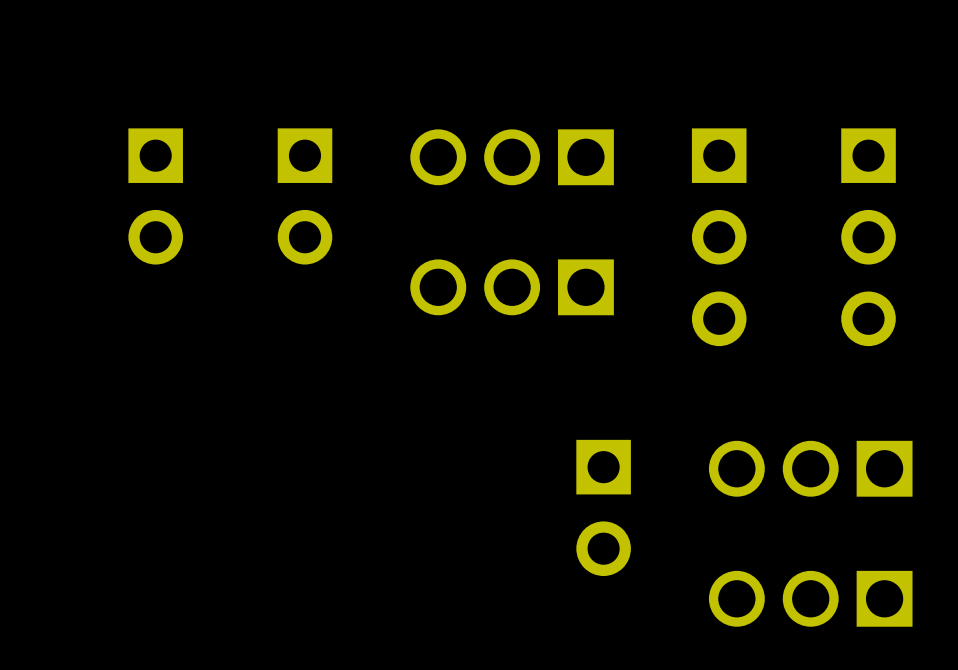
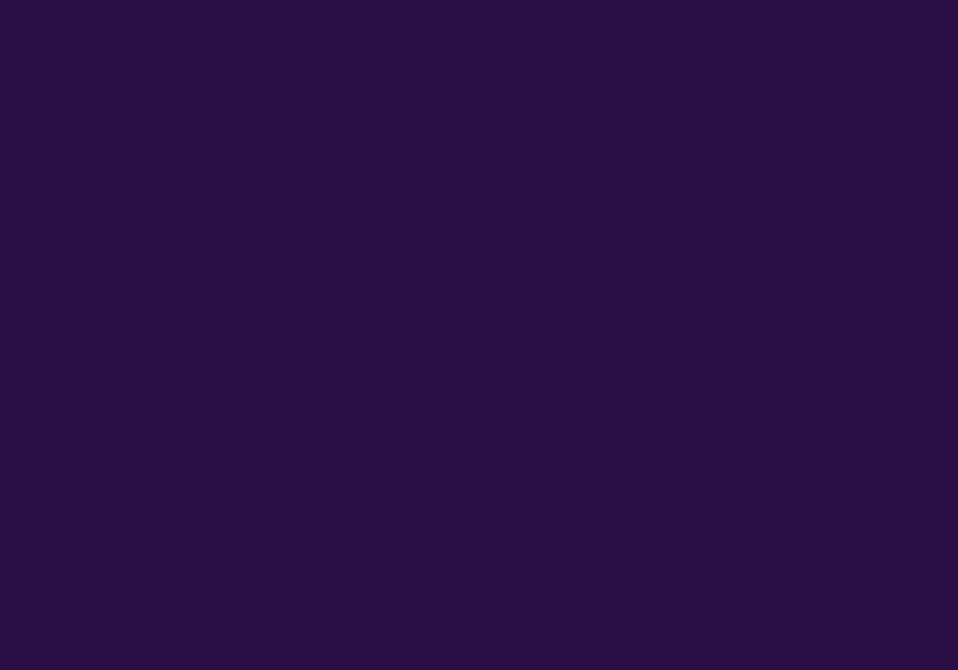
part: (512, 157) -> none
part: (155, 196) -> none
part: (304, 196) -> none
part: (719, 237) -> none
part: (868, 237) -> none
part: (512, 287) -> none
part: (810, 468) -> none
part: (603, 507) -> none
part: (810, 598) -> none

